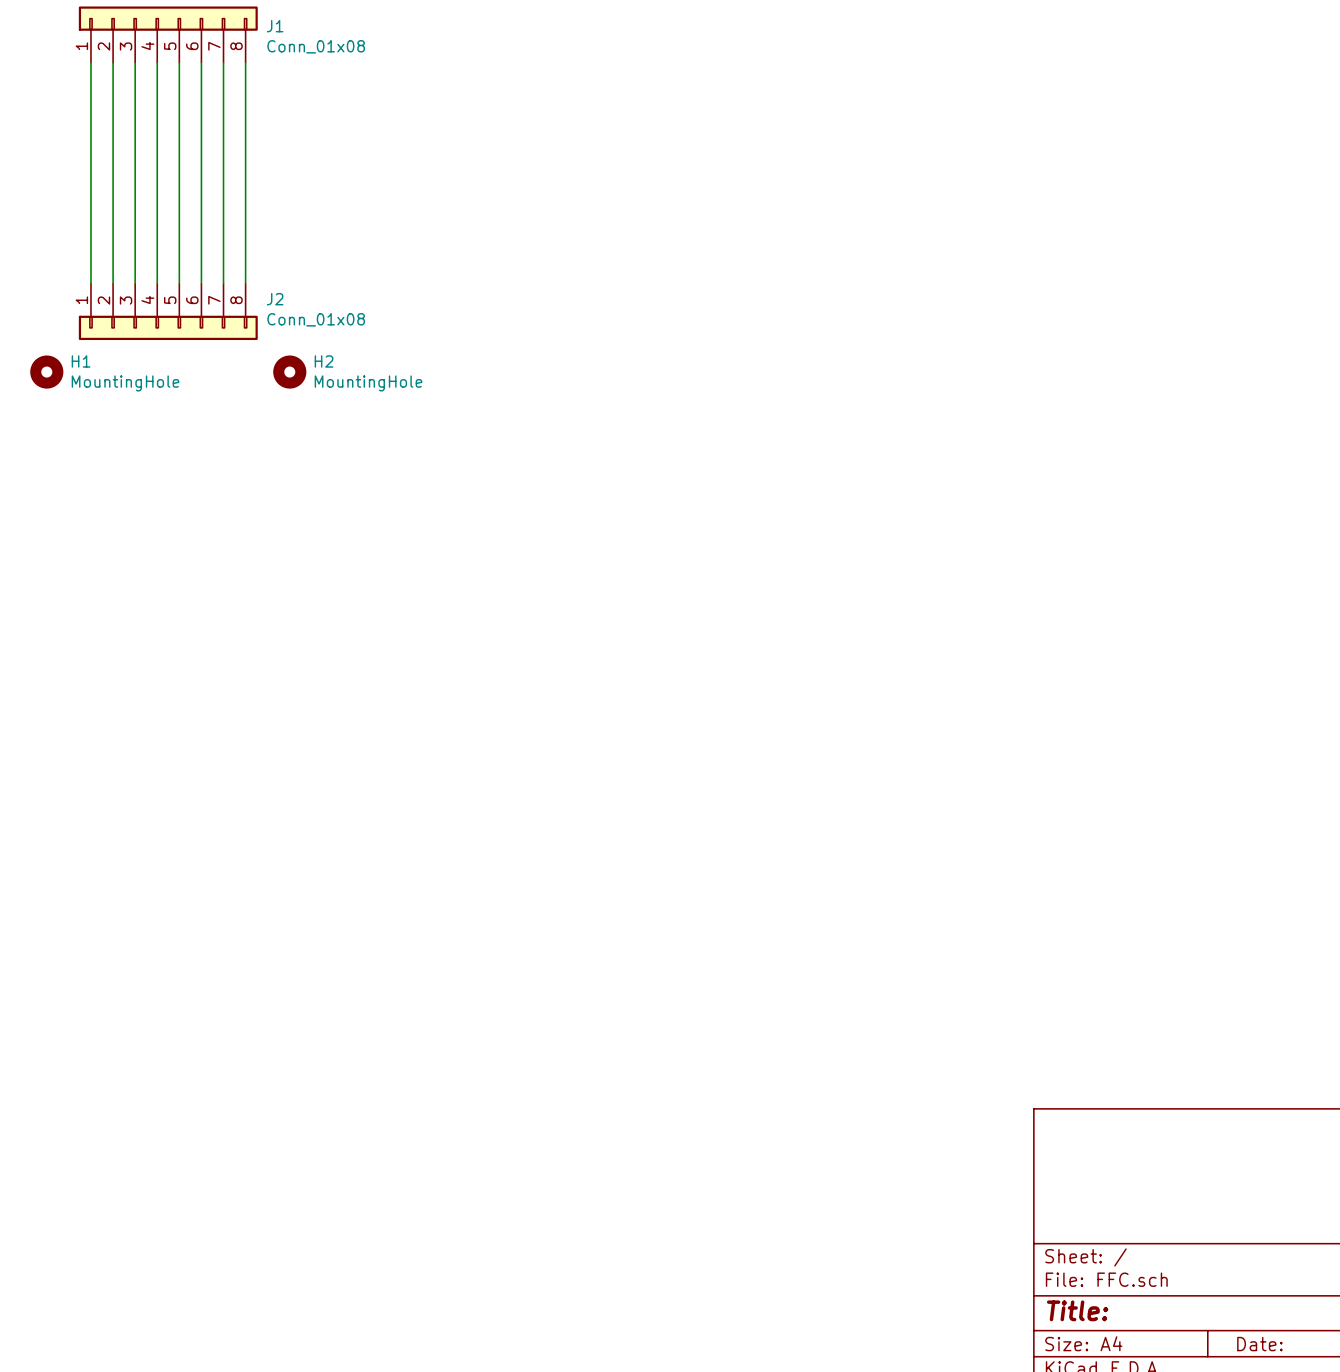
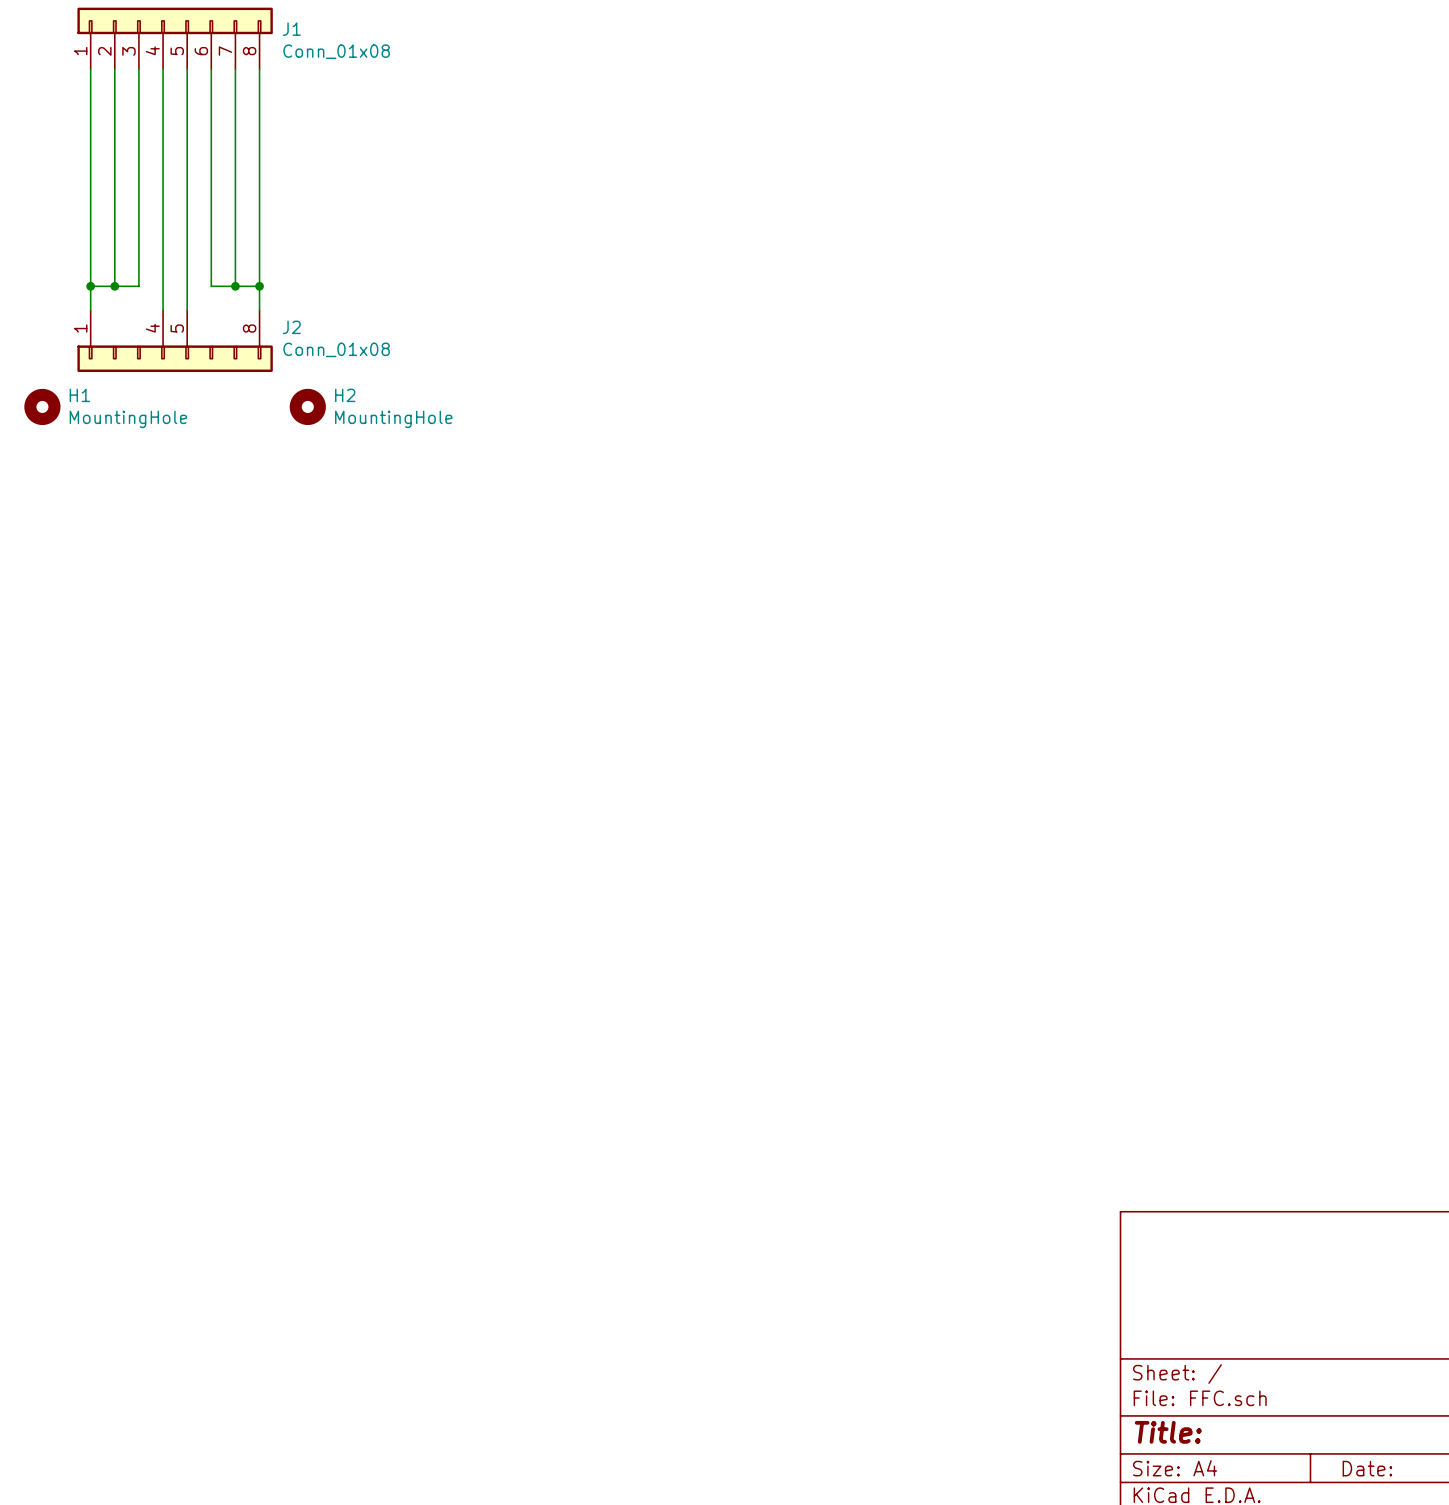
junction: none -> (90, 286)
wire: (113, 261) (113, 283) -> none
junction: none -> (114, 286)
wire: (135, 261) (135, 283) -> (138, 286) (90, 286)
wire: (201, 261) (201, 283) -> (211, 286) (259, 286)
wire: (223, 261) (223, 283) -> none
junction: none -> (235, 286)
junction: none -> (259, 286)
J2 symbol: [78, 283, 258, 341] -> [77, 310, 273, 372]

